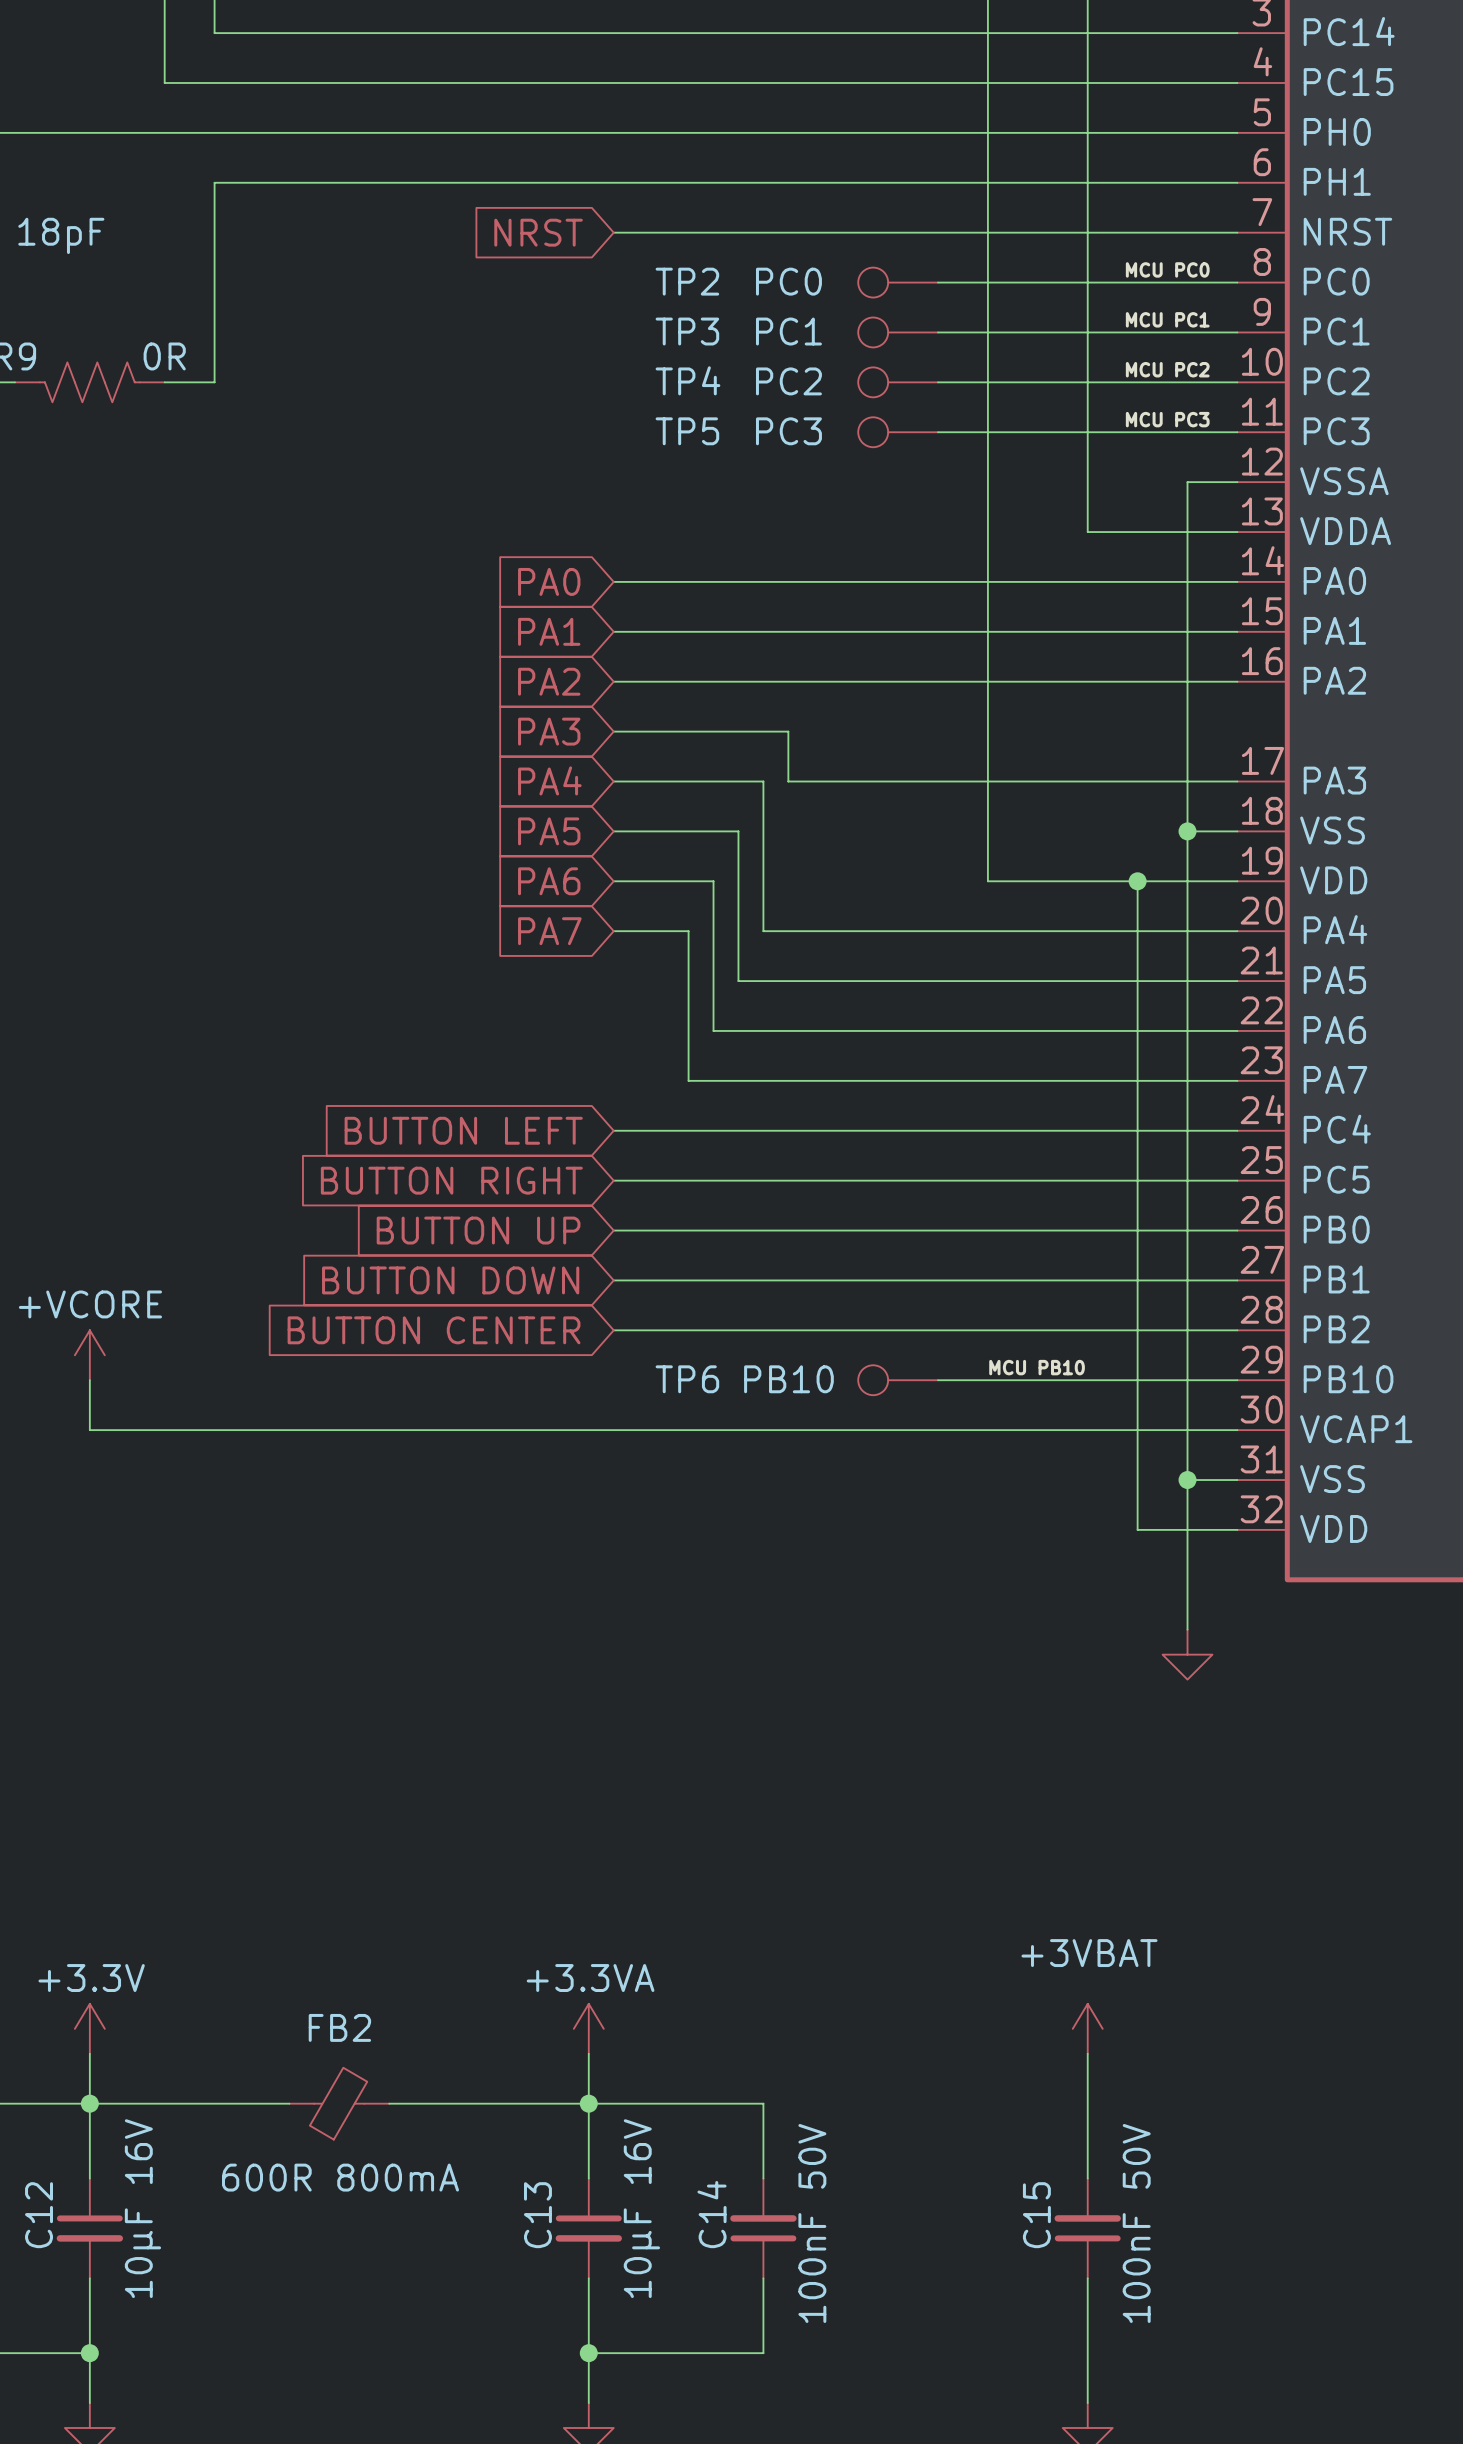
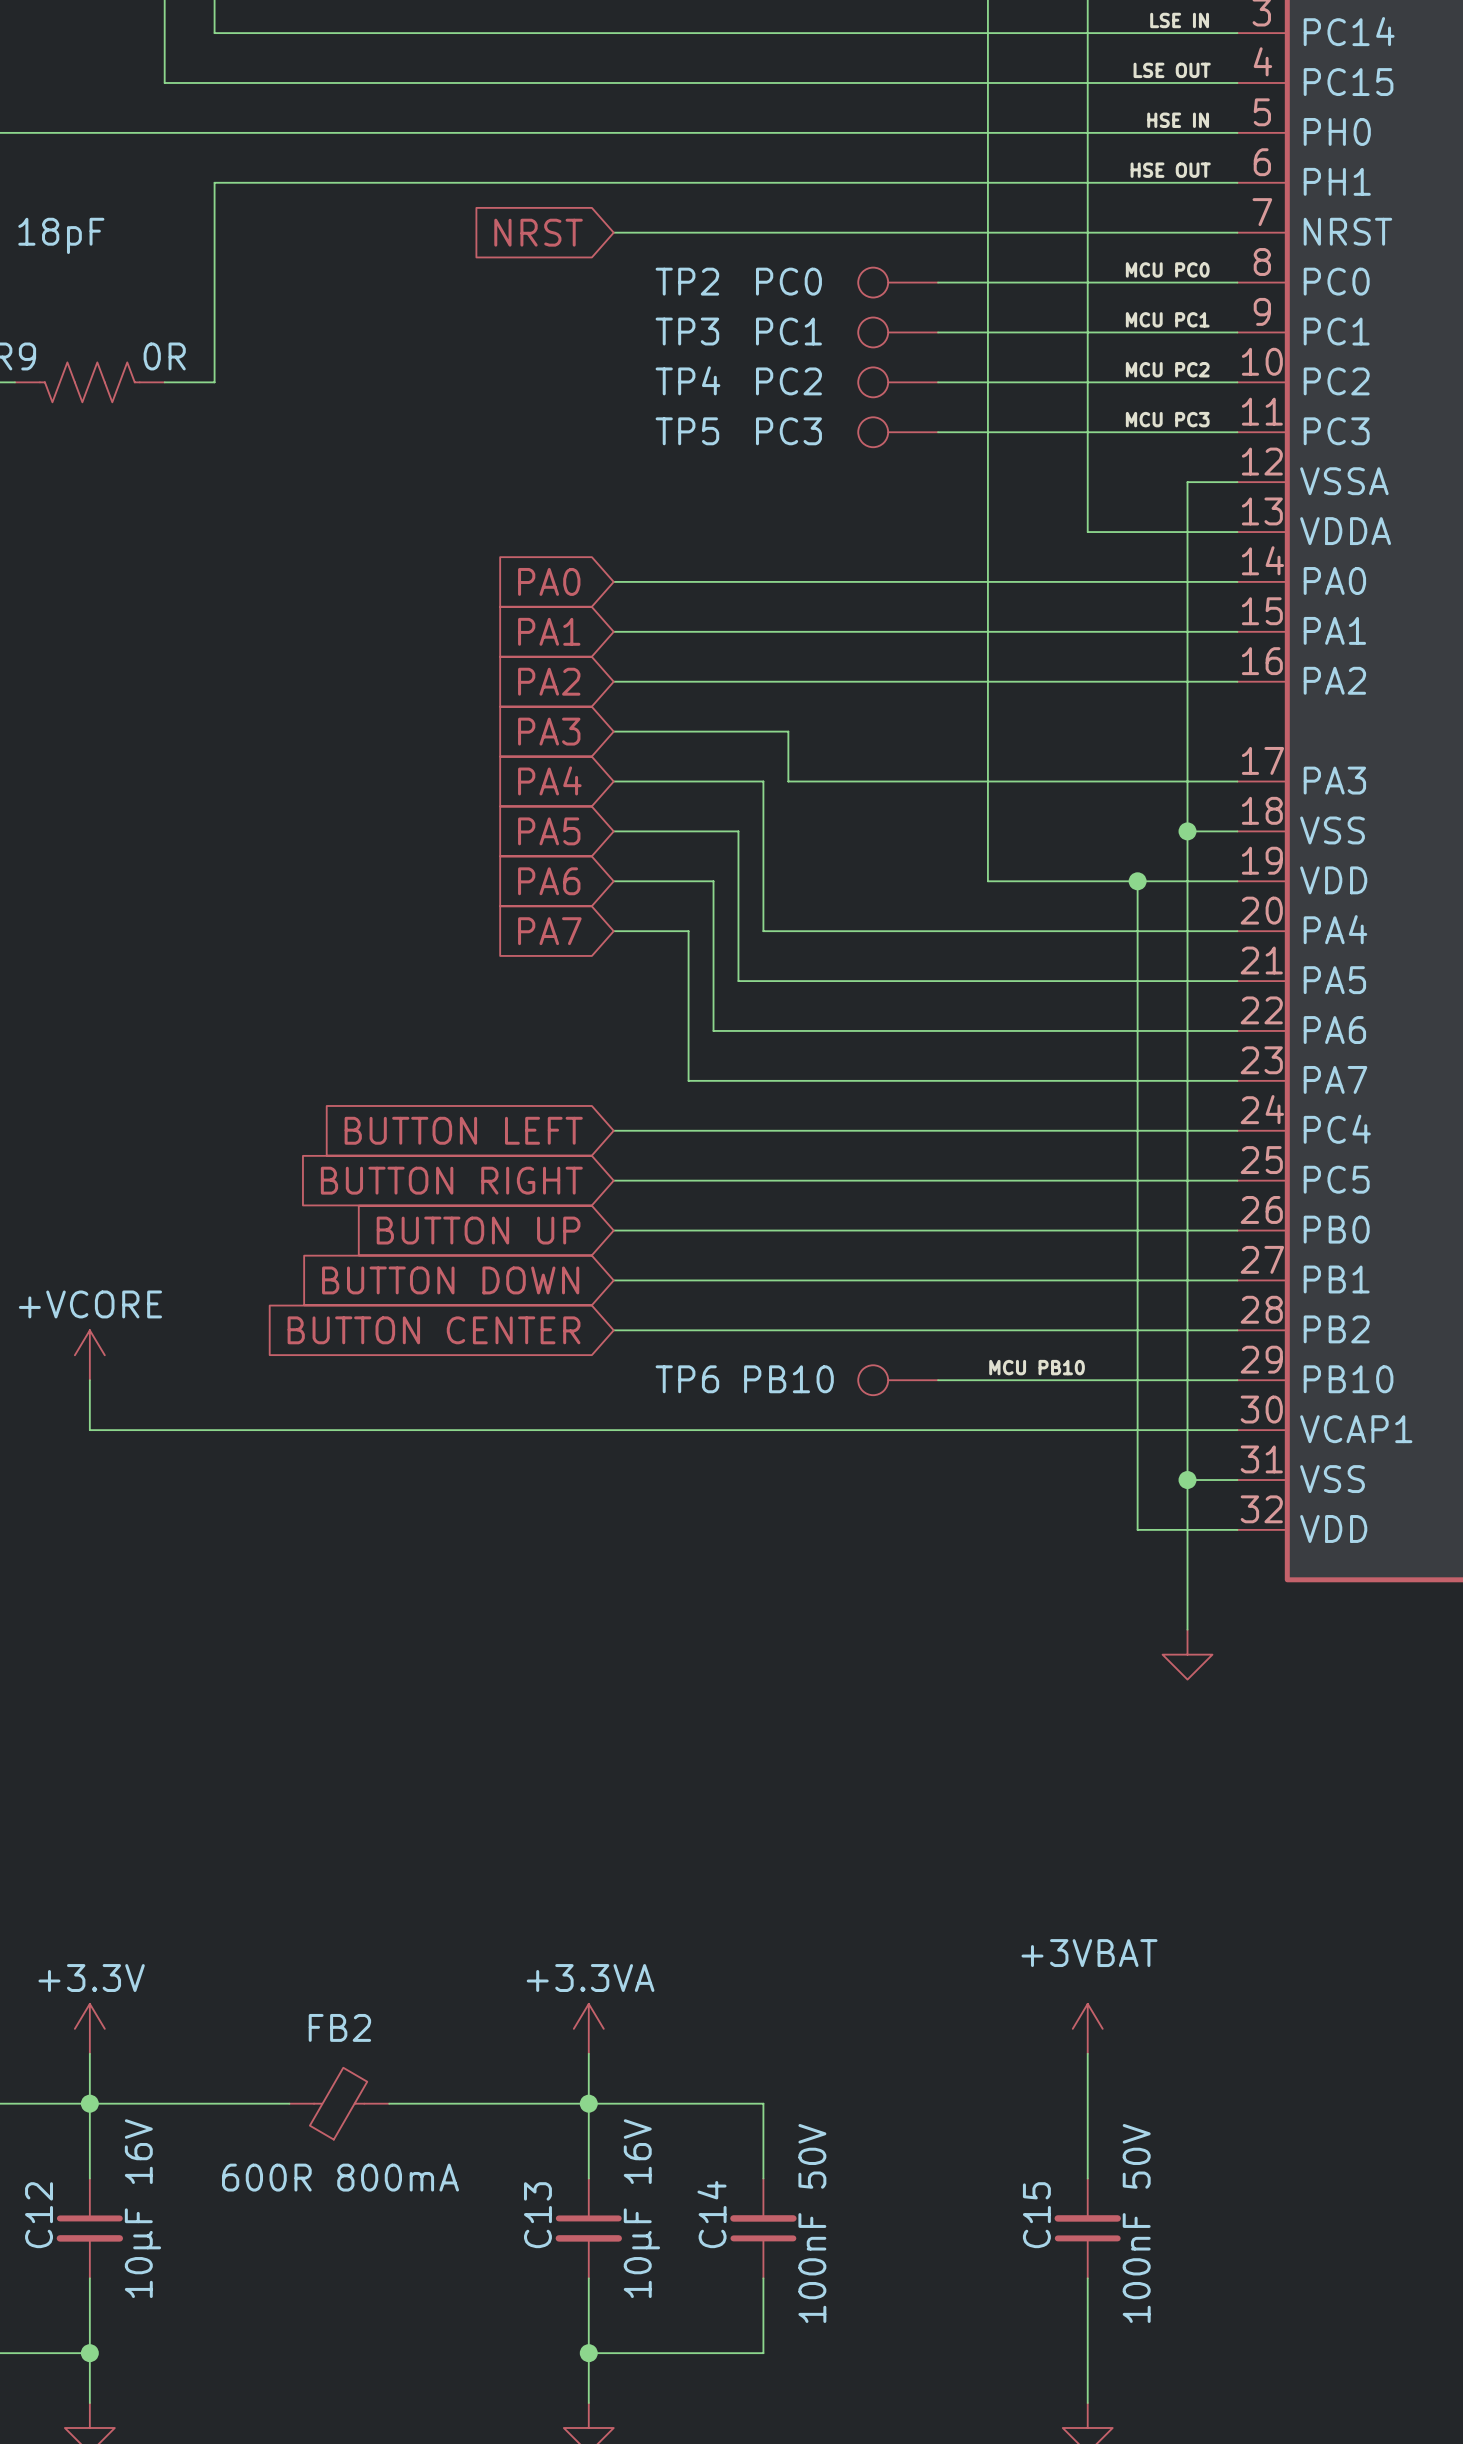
label: none -> LSE IN (1179, 20)
label: none -> LSE OUT (1172, 70)
label: none -> HSE IN (1178, 120)
label: none -> HSE OUT (1170, 170)

